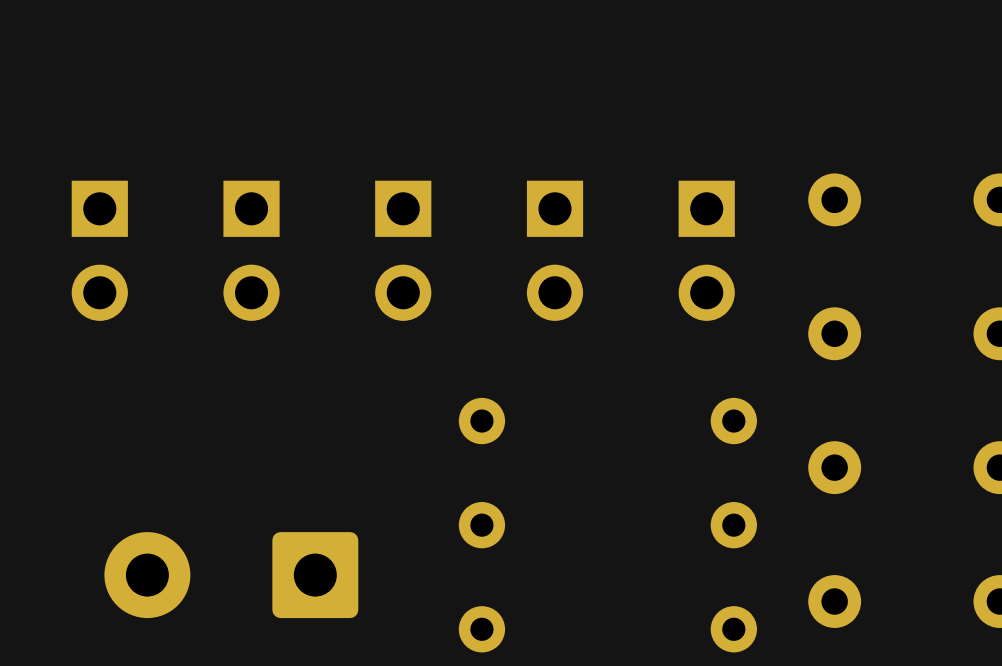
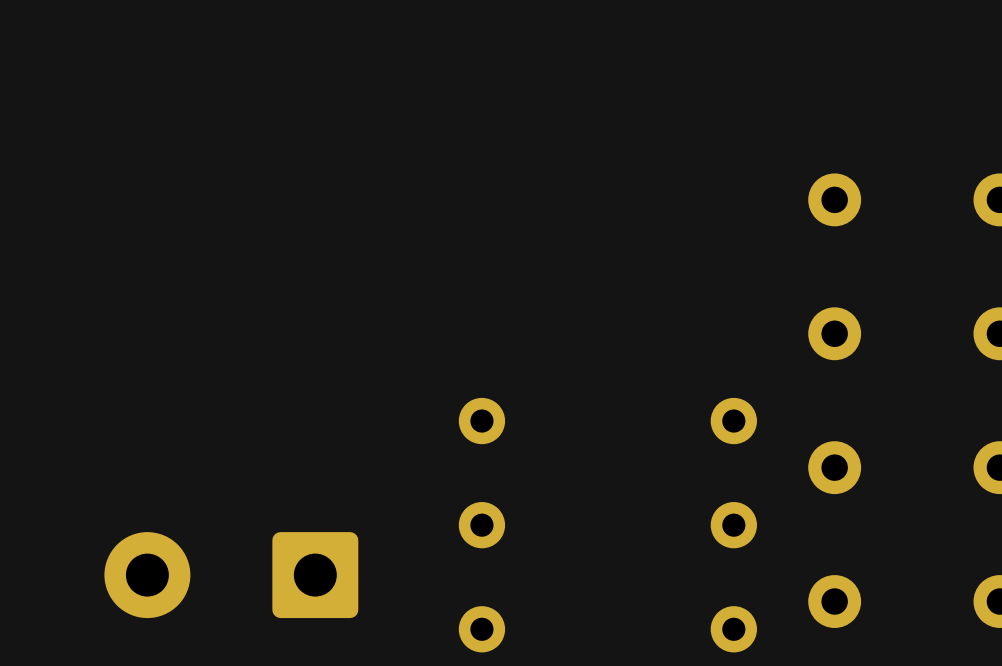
part: (99, 250) -> none
part: (251, 250) -> none
part: (403, 250) -> none
part: (555, 250) -> none
part: (706, 250) -> none

